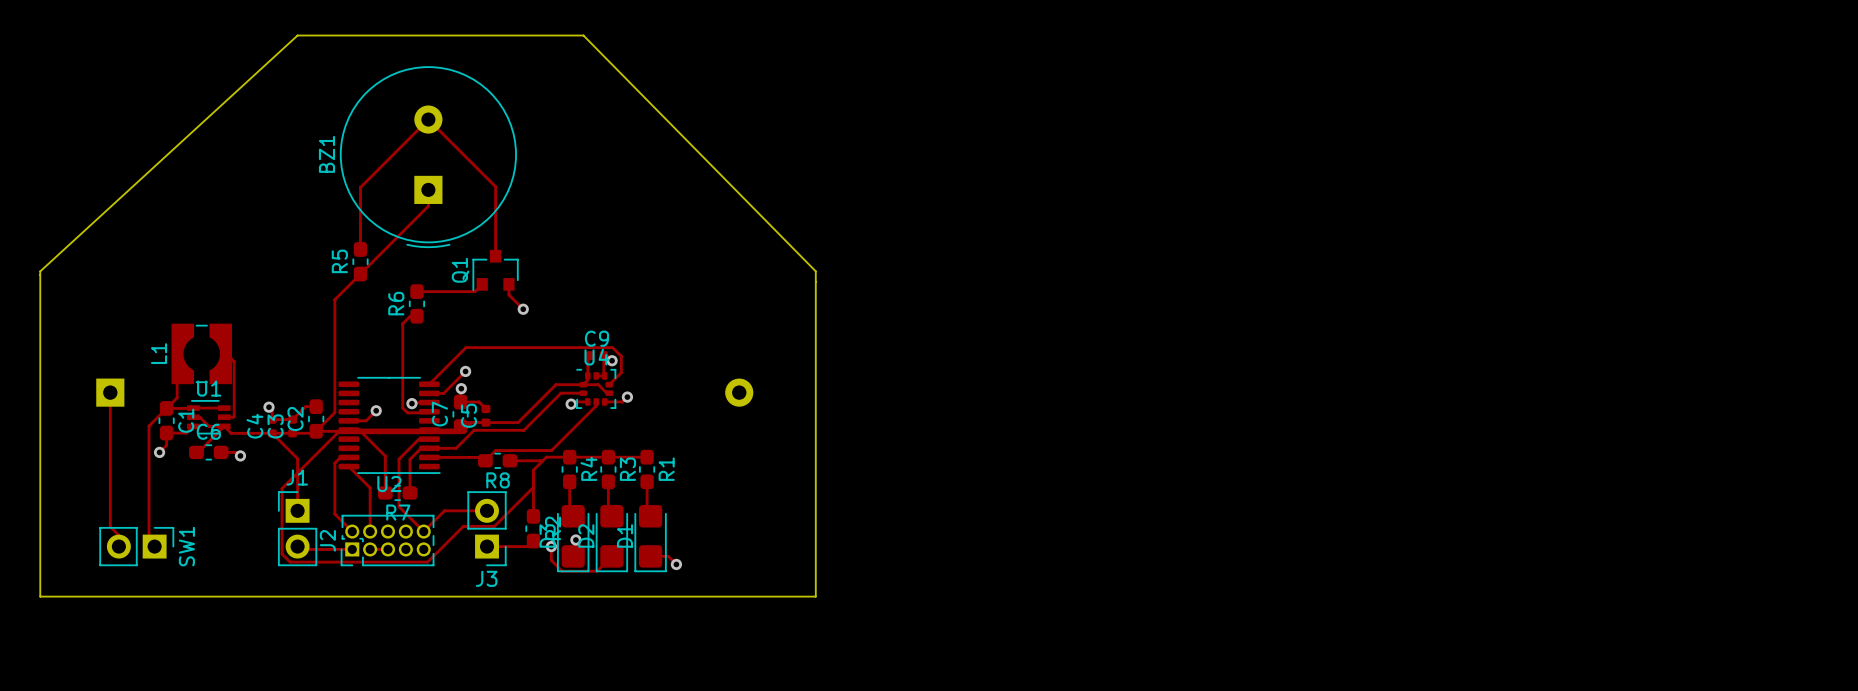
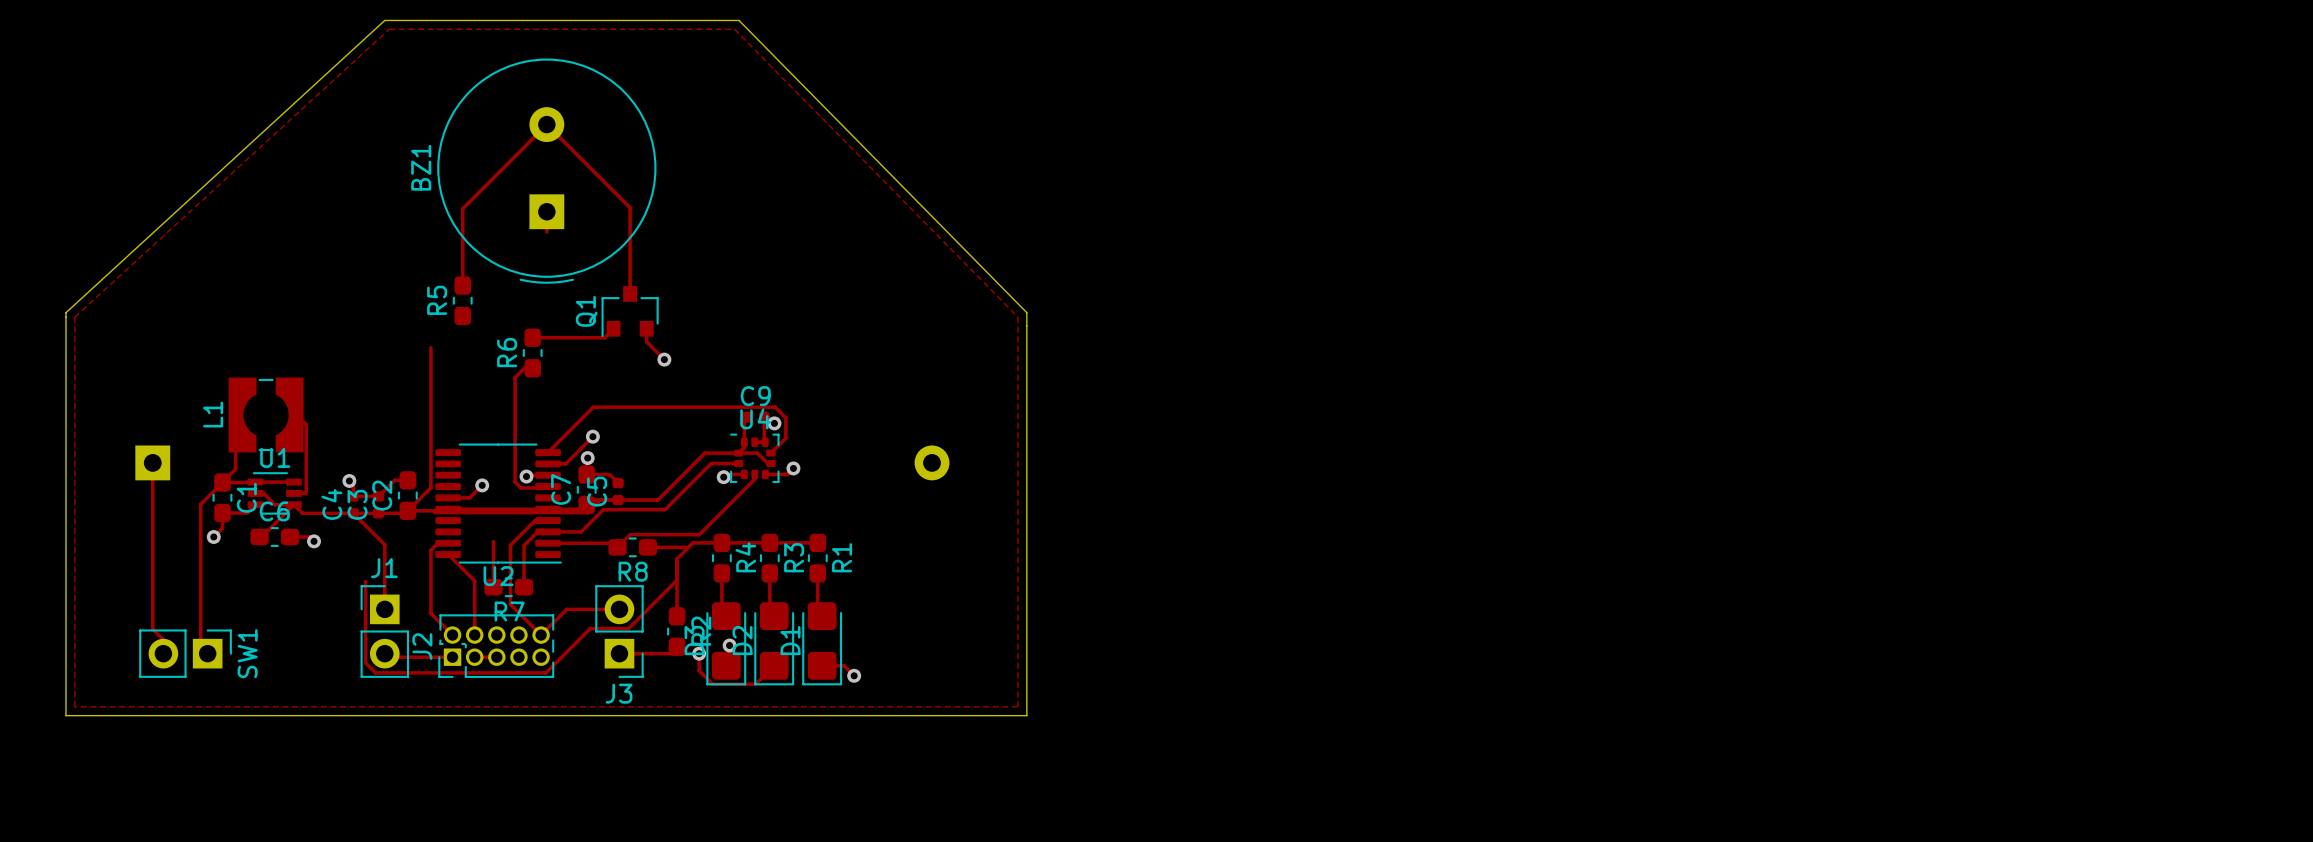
zone outline: none -> (389, 29) (74, 317) (74, 706) (1017, 706) (1017, 317) (734, 29) (389, 29)
track: (428, 206) (334, 299) -> none
track: (359, 429) (385, 456) -> none
track: (337, 432) (282, 488) -> none

